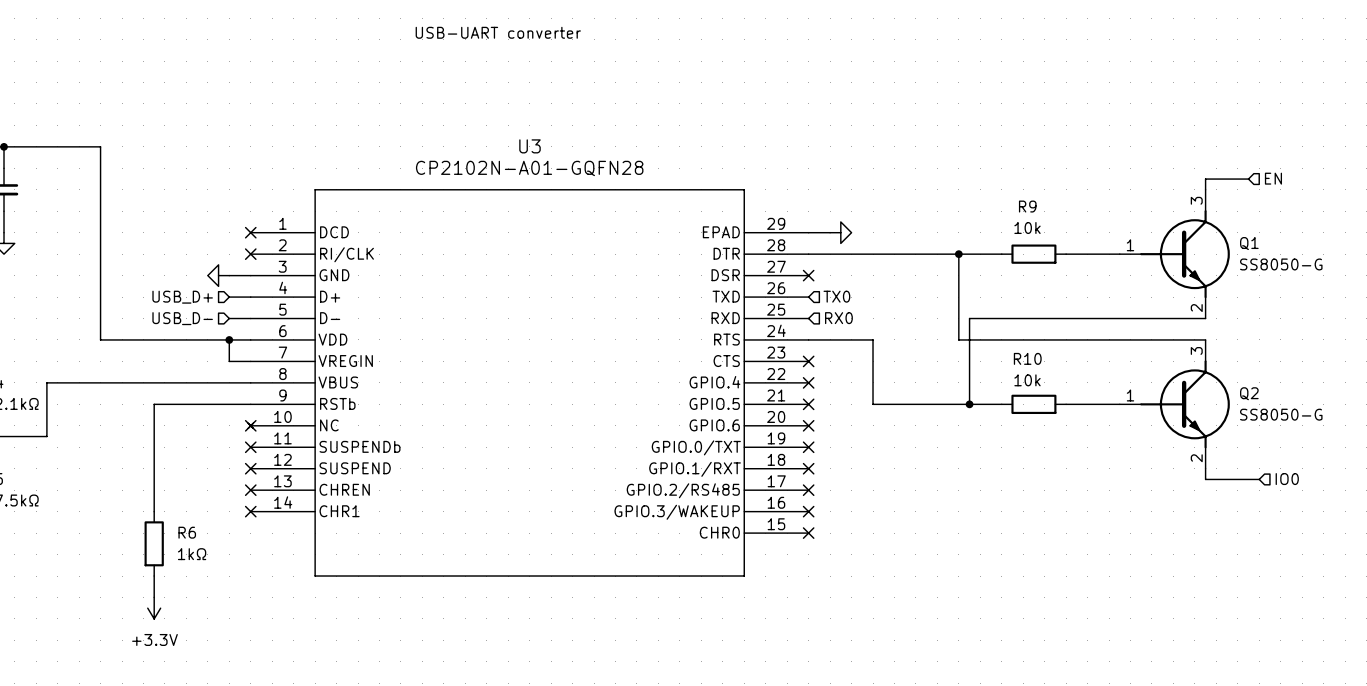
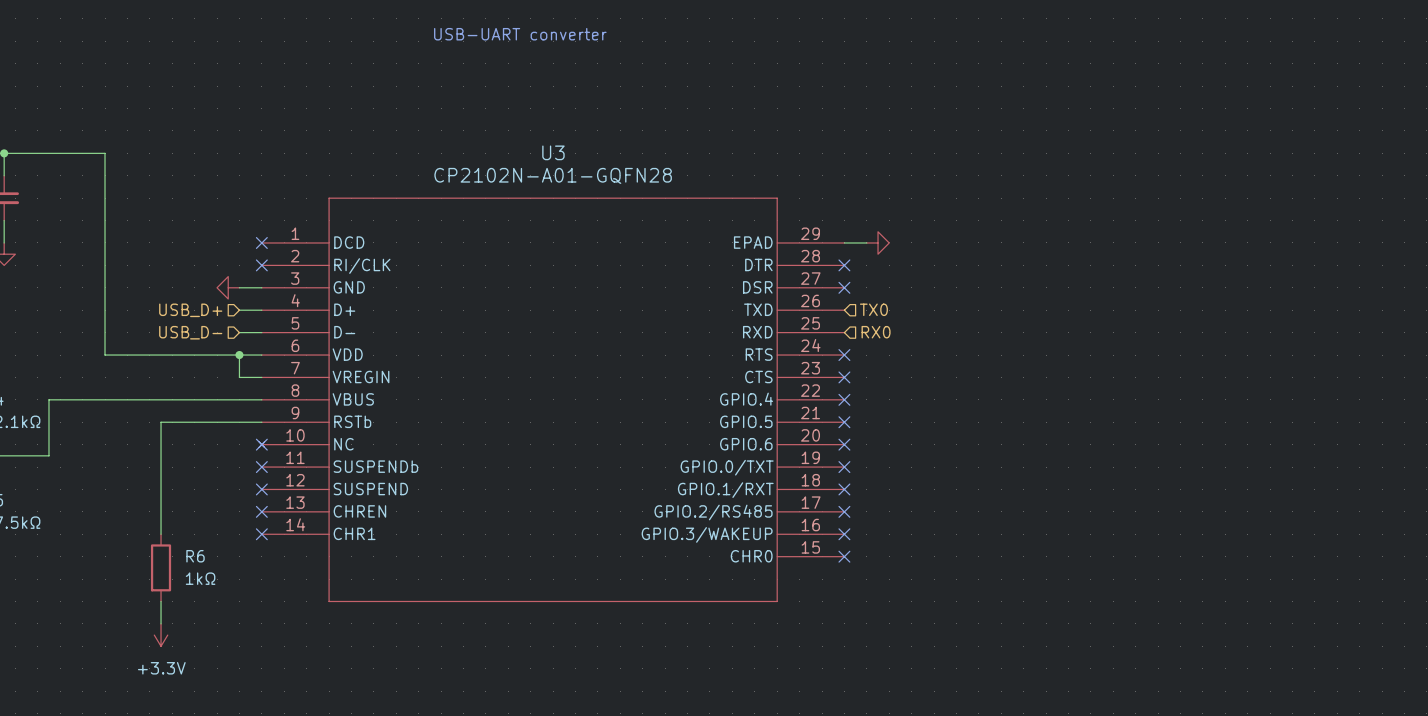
hierarchical label: EN (1273, 178) -> none
wire: (1248, 179) (1205, 179) (1205, 189) -> none
wire: (808, 254) (1001, 254) -> none
no-connect mark: none -> (844, 265)
wire: (958, 254) (958, 339) (1205, 339) -> none
junction: (958, 254) -> none
R9: 10k (1033, 254) -> none
wire: (1066, 254) (1119, 254) -> none
Q1: SS8050-G (1174, 254) -> none
wire: (1205, 318) (969, 318) (969, 404) -> none
wire: (808, 339) (873, 339) (873, 404) (1001, 404) -> none
no-connect mark: none -> (844, 355)
junction: (969, 404) -> none
R10: 10k (1033, 404) -> none
wire: (1066, 404) (1119, 404) -> none
Q2: SS8050-G (1174, 404) -> none
wire: (1205, 468) (1205, 479) (1259, 479) -> none
hierarchical label: IO0 (1287, 479) -> none

